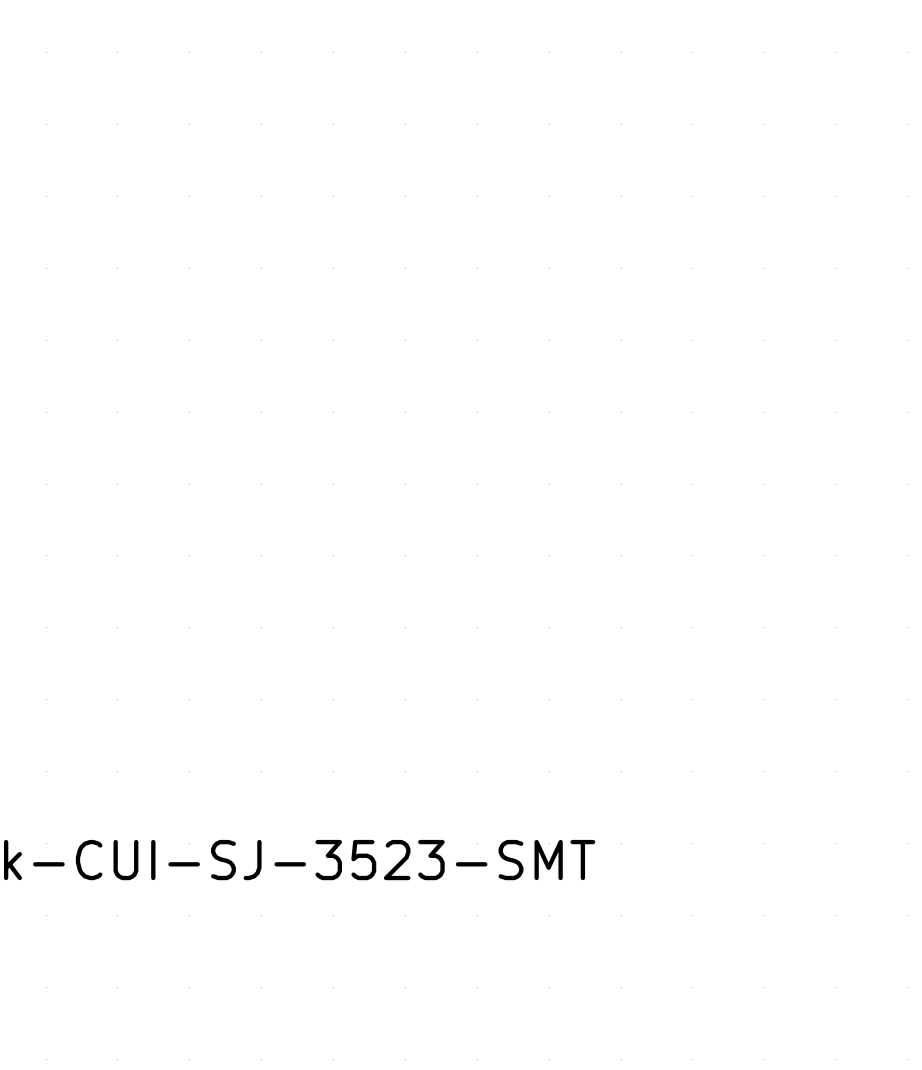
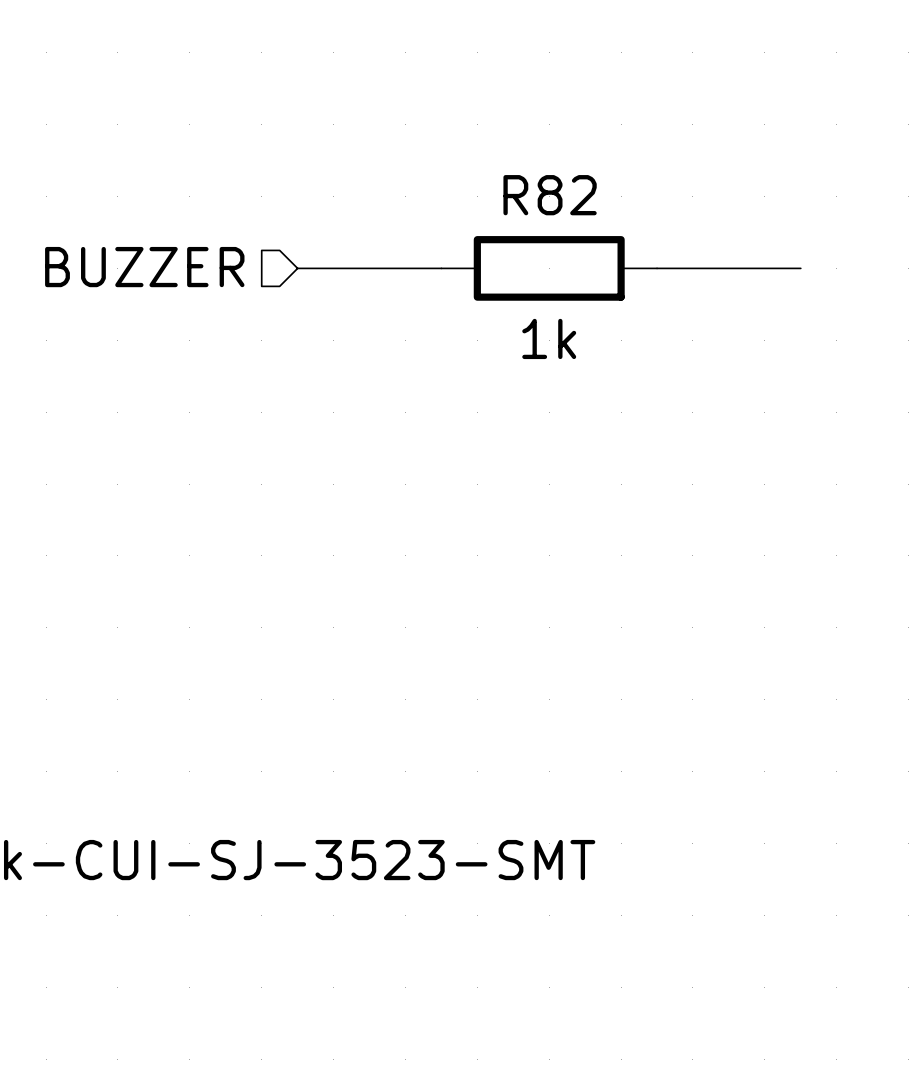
hierarchical label: none -> BUZZER (144, 267)
wire: none -> (297, 268) (441, 268)
R82: none -> 1k (549, 268)
wire: none -> (657, 268) (800, 268)

